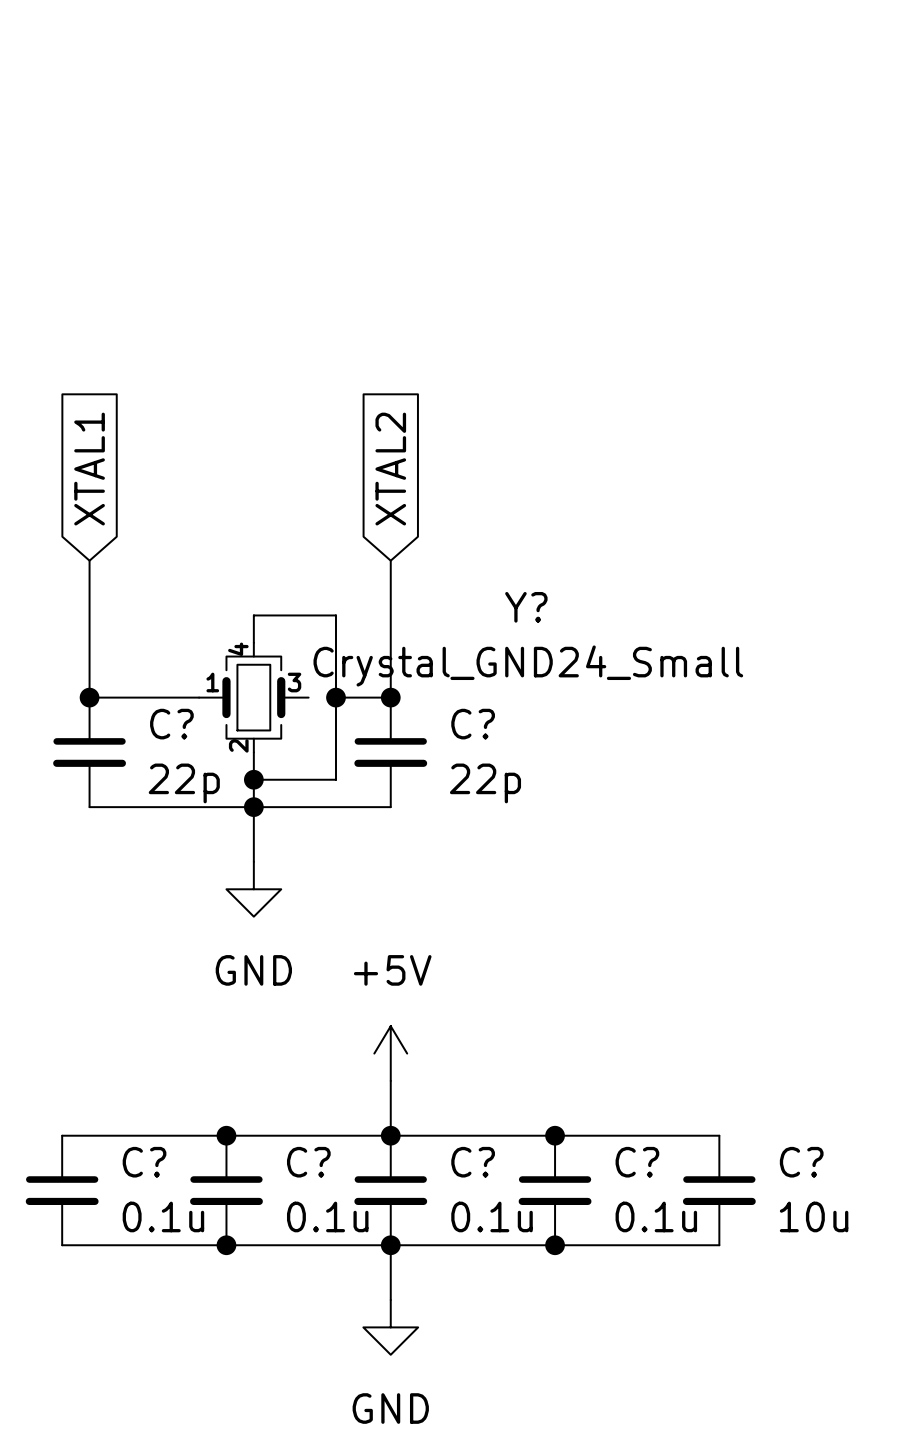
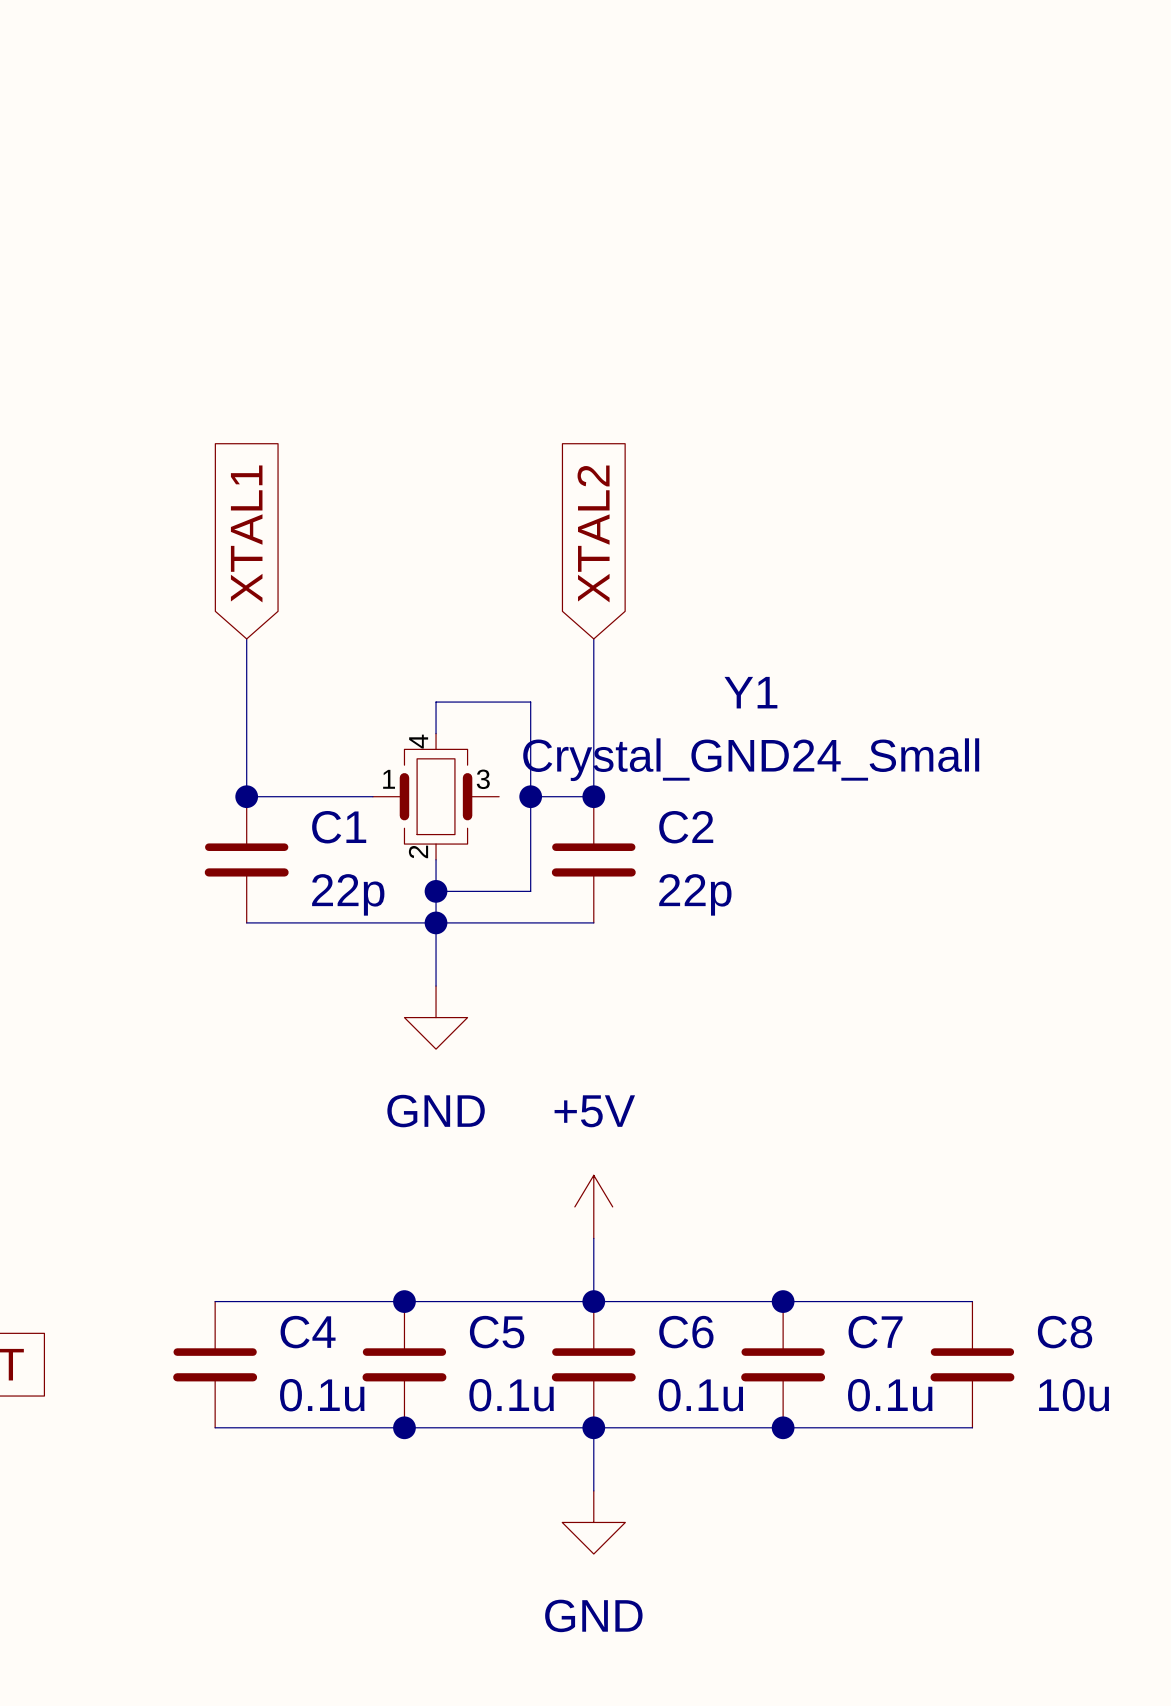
Y? name: Y? (526, 607) -> Y1 (750, 692)
C? name: C? (171, 724) -> C1 (339, 827)
C? name: C? (473, 724) -> C2 (686, 827)
C? name: C? (144, 1162) -> C4 (308, 1332)
C? name: C? (308, 1162) -> C5 (497, 1332)
C? name: C? (473, 1162) -> C6 (686, 1332)
C? name: C? (637, 1162) -> C7 (875, 1332)
C? name: C? (801, 1162) -> C8 (1065, 1332)

